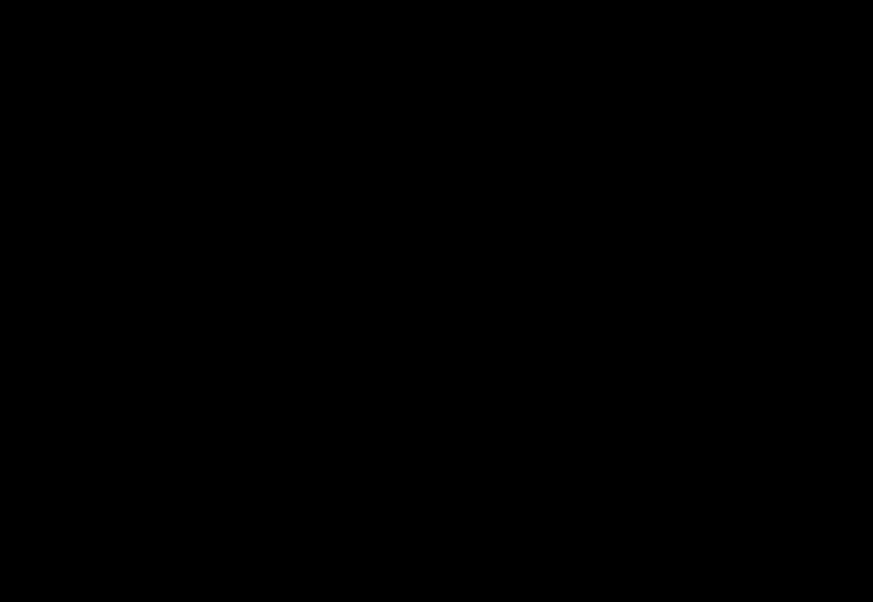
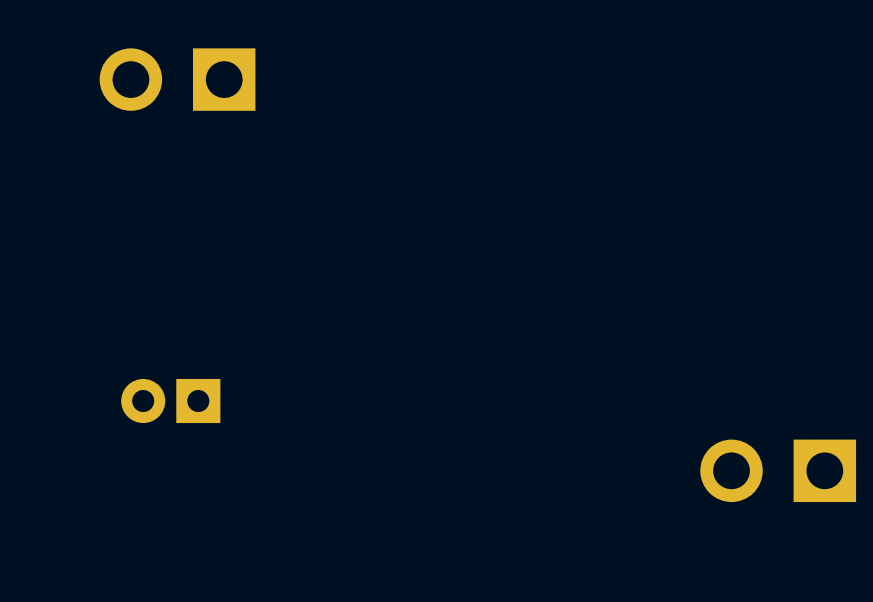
part: none -> (177, 79)
part: none -> (170, 401)
part: none -> (778, 470)

